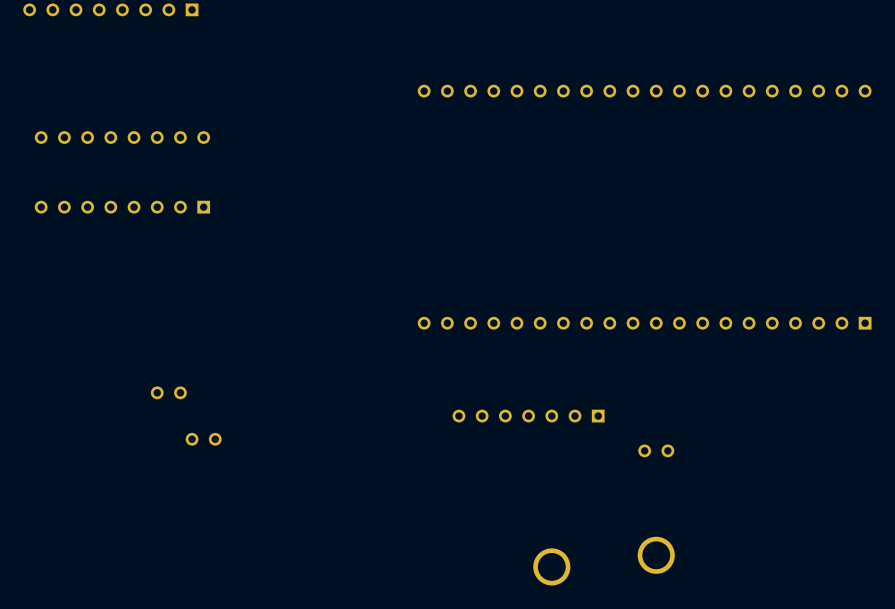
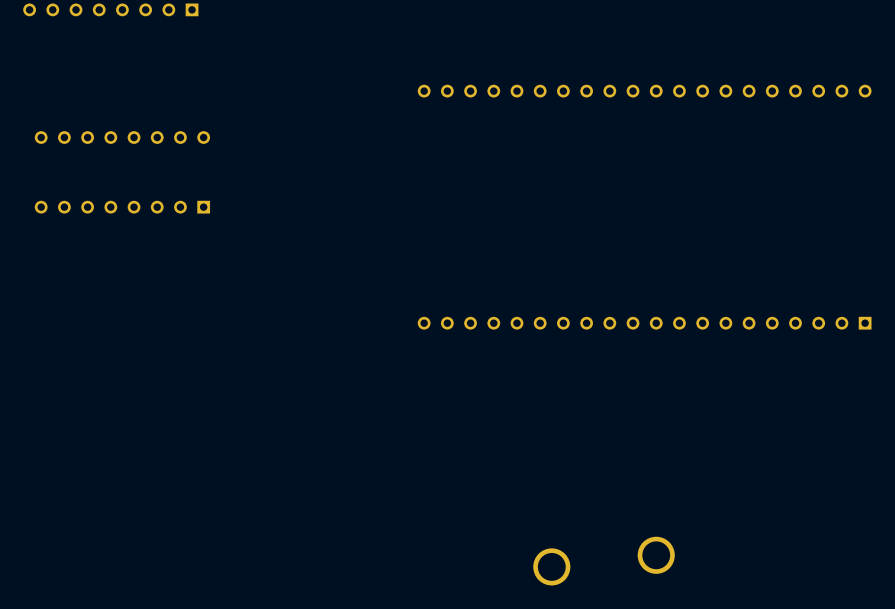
part: (168, 392) -> none
part: (528, 416) -> none
part: (203, 439) -> none
part: (656, 450) -> none

